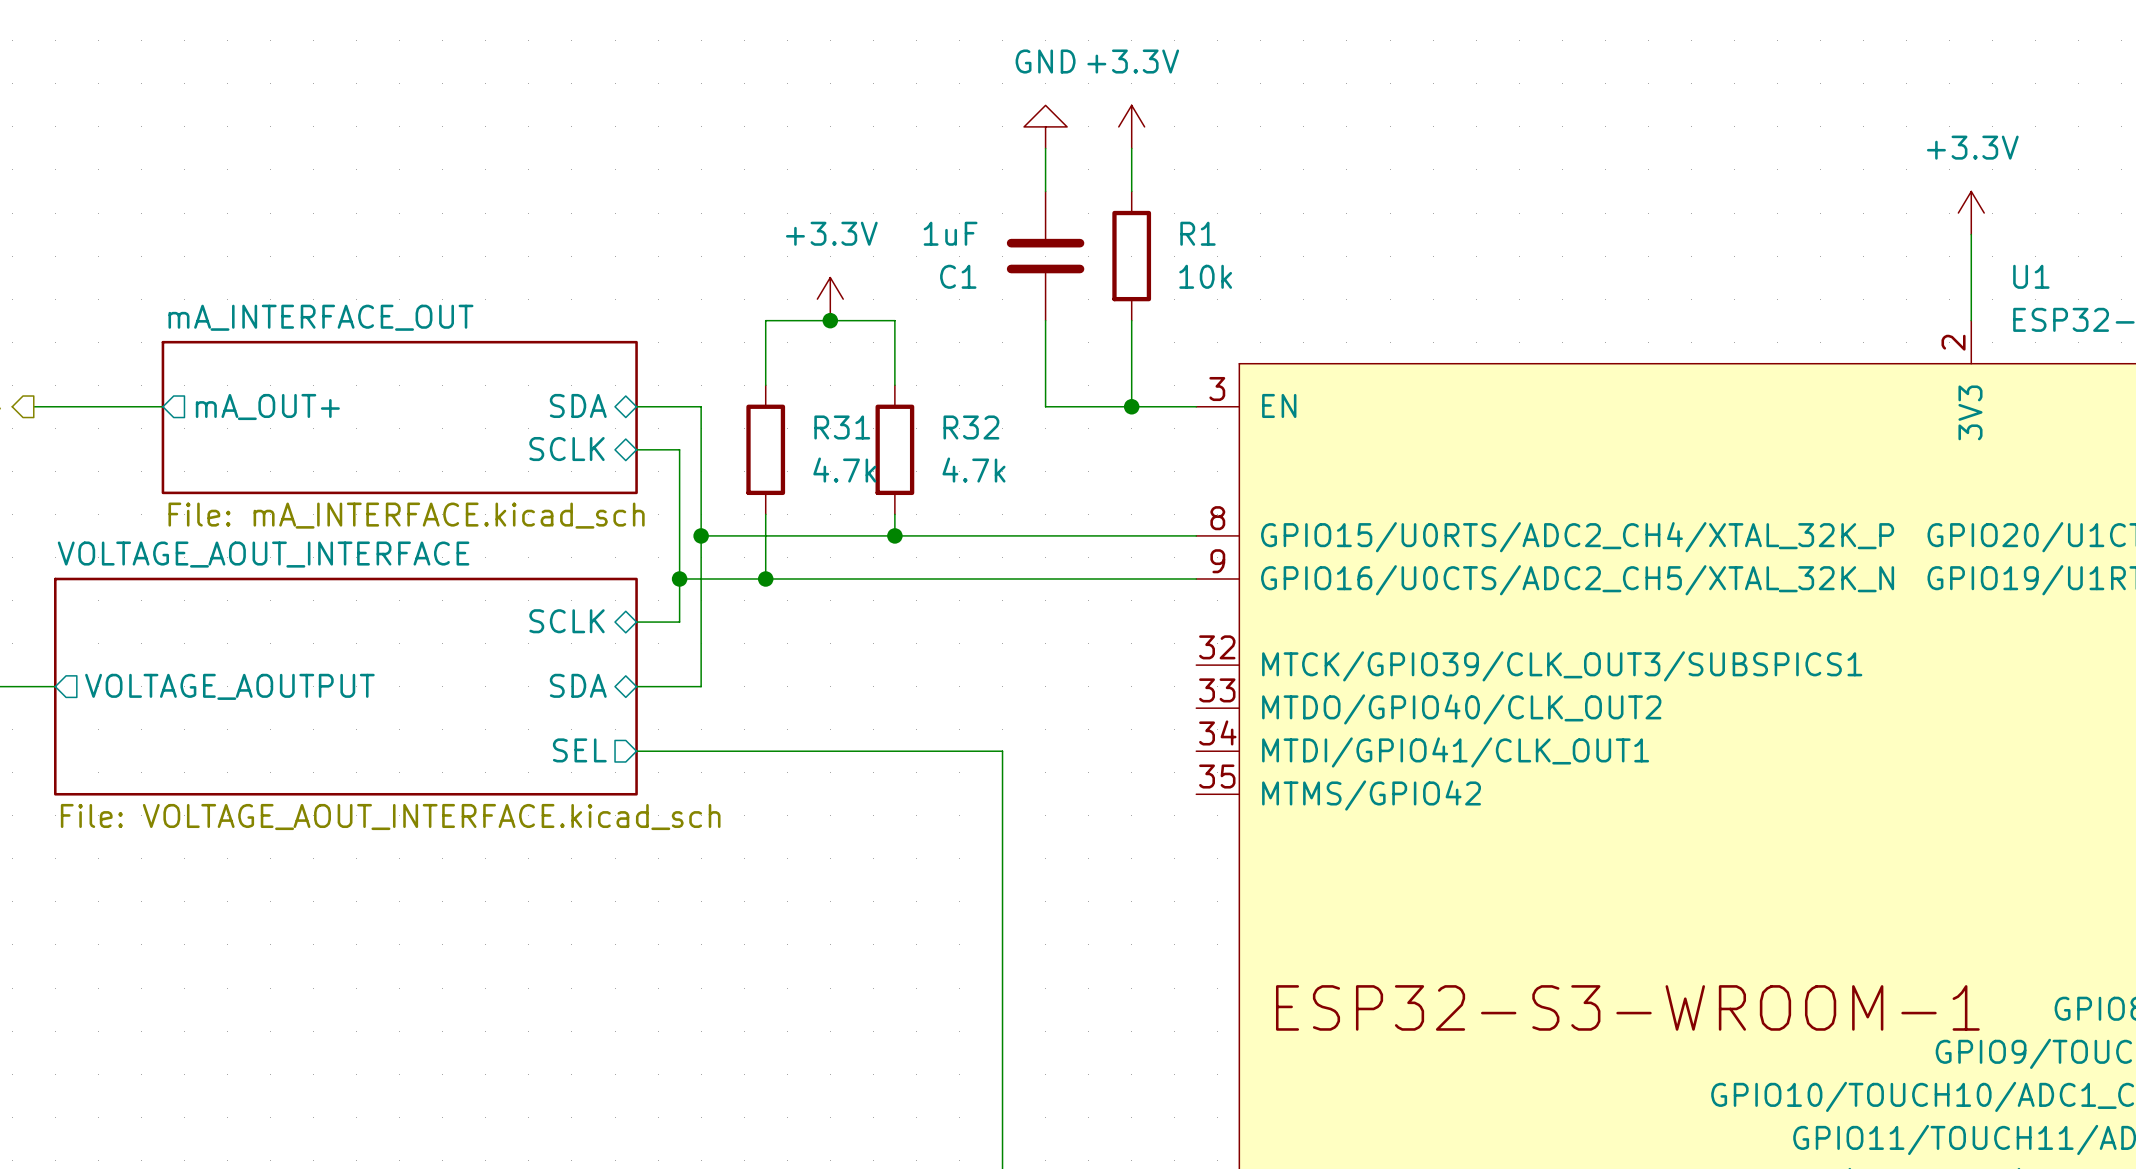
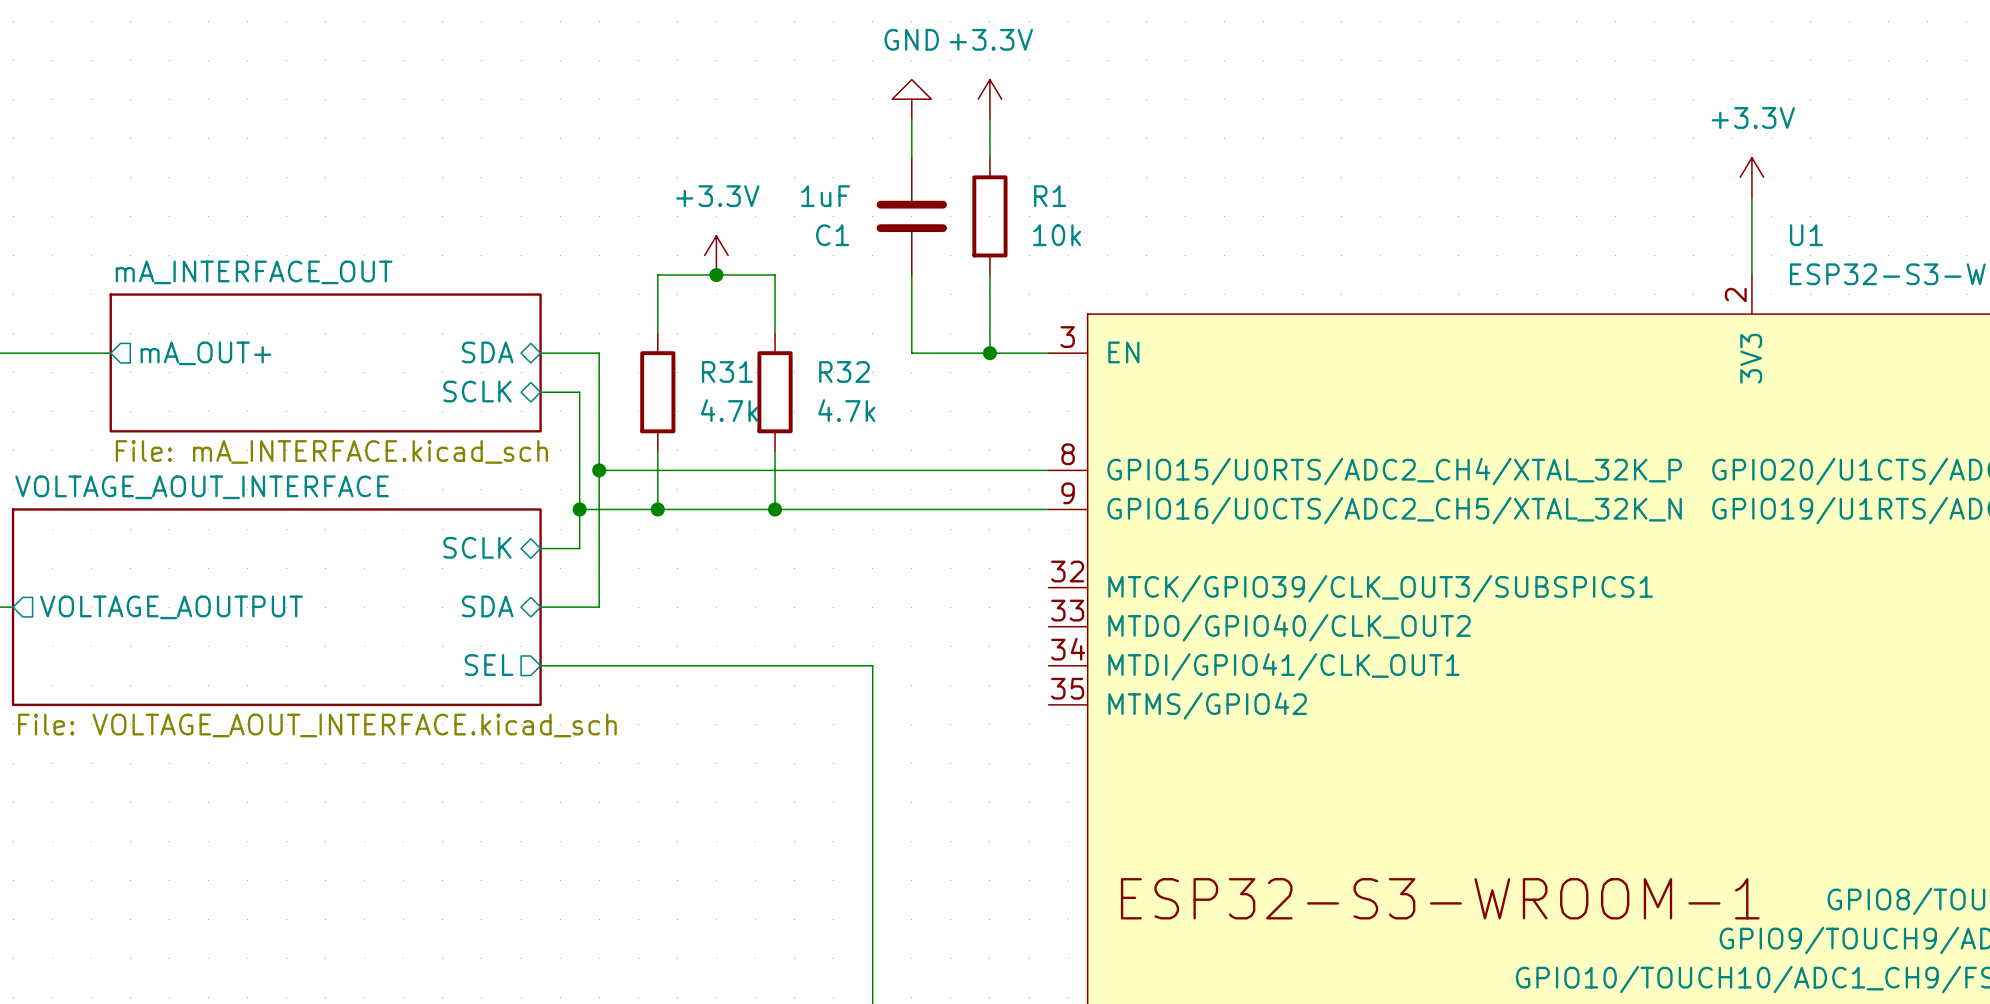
wire: none -> (775, 470) (775, 509)
junction position: (894, 535) -> (775, 509)

